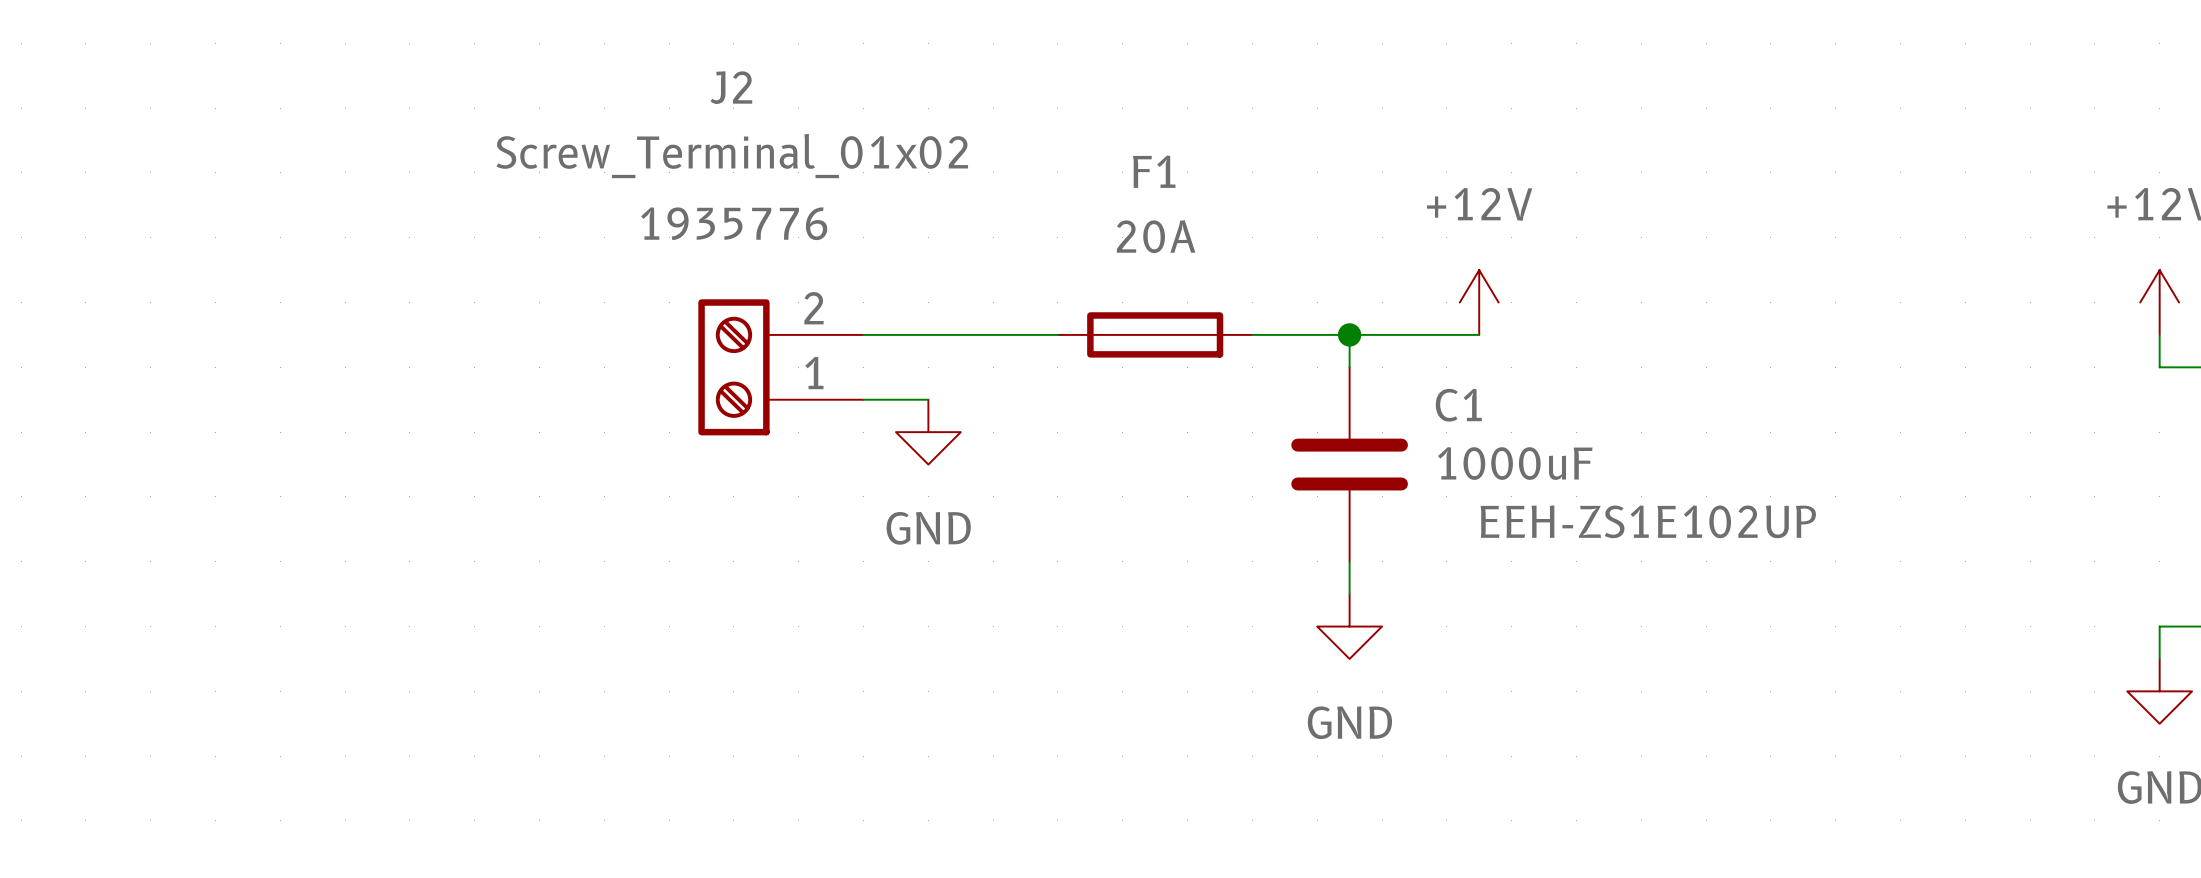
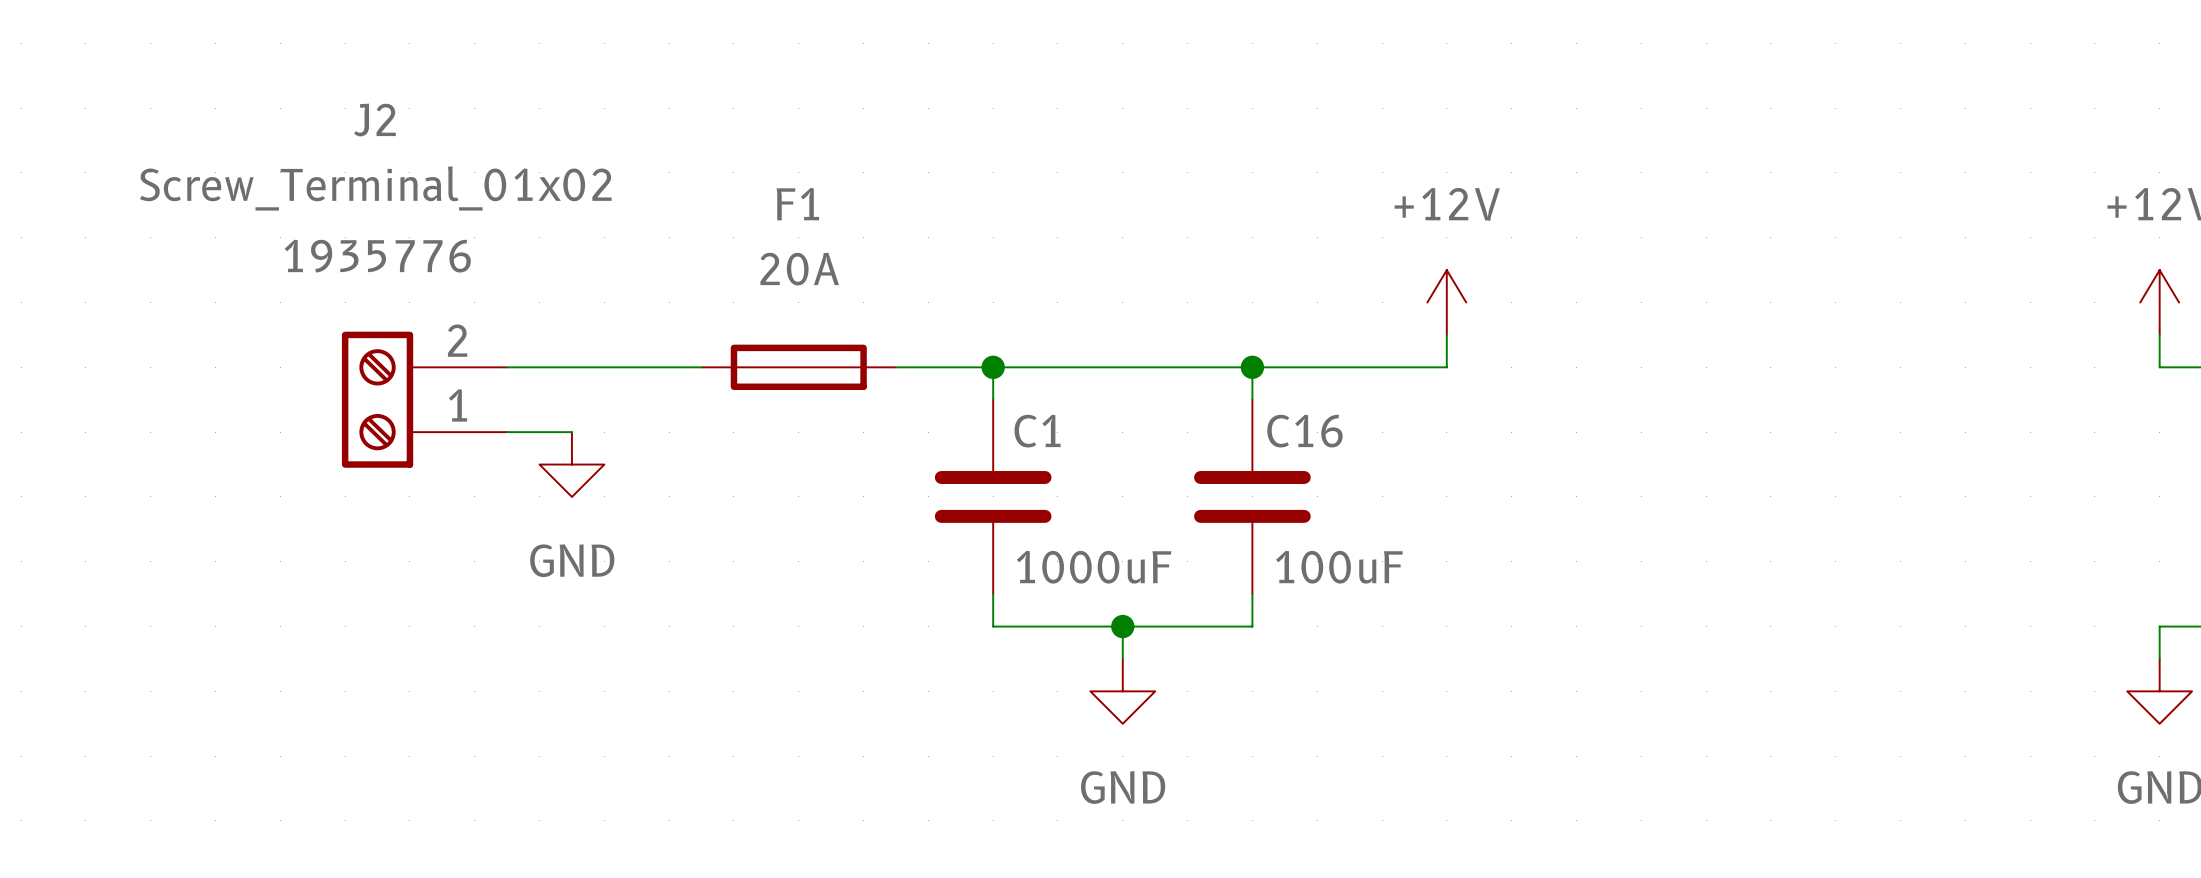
power symbol position: +12V (1479, 302) -> +12V (1446, 302)
wire: (863, 334) (1057, 334) -> (507, 367) (701, 367)
F1 position: (1155, 334) -> (798, 367)
wire: (1252, 334) (1479, 334) -> none
wire: (1349, 334) (1349, 367) -> (993, 367) (993, 399)
junction position: (1349, 334) -> (1252, 367)
wire: none -> (1446, 334) (1446, 367) (895, 367)
J2 position: (780, 367) -> (424, 399)
junction: none -> (993, 367)
wire: (863, 399) (928, 399) -> (507, 432) (571, 432)
C1 name position: C1 (1458, 405) -> C1 (1037, 431)
power symbol: GND (928, 432) -> none
C1 value position: 1000uF (1515, 463) -> 1000uF (1094, 567)
power symbol: none -> GND (571, 464)
C1 position: (1349, 464) -> (993, 496)
C16: none -> 100uF (1252, 496)
C1 text: EEH-ZS1E102UP (1648, 521) -> none
wire: (1349, 561) (1349, 594) -> (1252, 367) (1252, 399)
wire: none -> (993, 594) (993, 626) (1252, 626) (1252, 594)
wire: none -> (1122, 626) (1122, 658)
junction: none -> (1122, 626)
power symbol: GND (1349, 626) -> none
power symbol: none -> GND (1122, 691)

